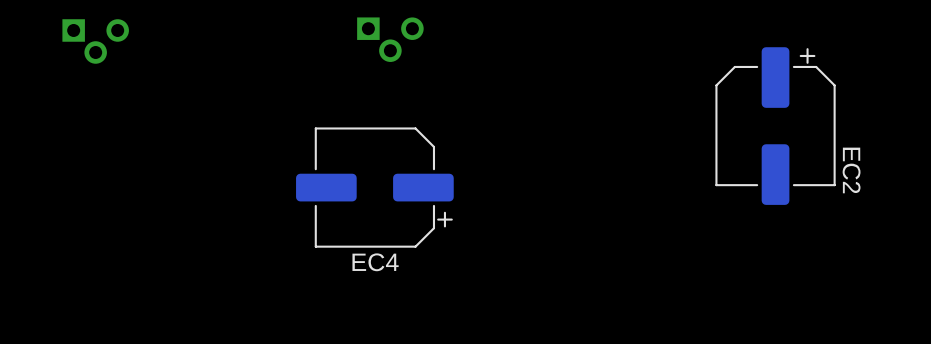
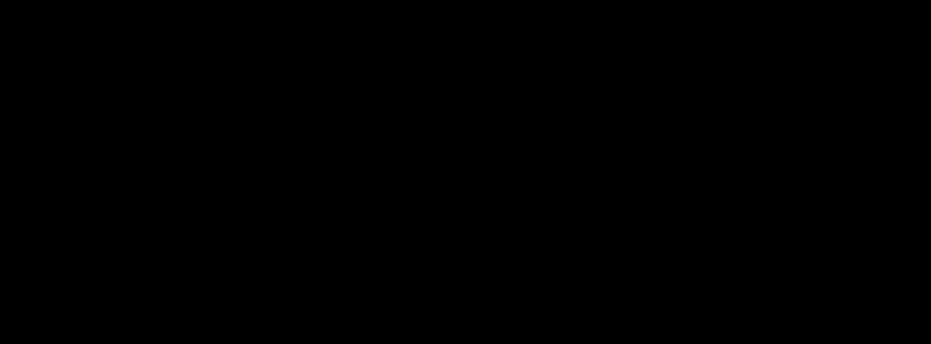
part: (390, 39) -> none
part: (95, 41) -> none
EC2: (775, 126) -> none
EC4: (374, 187) -> none

